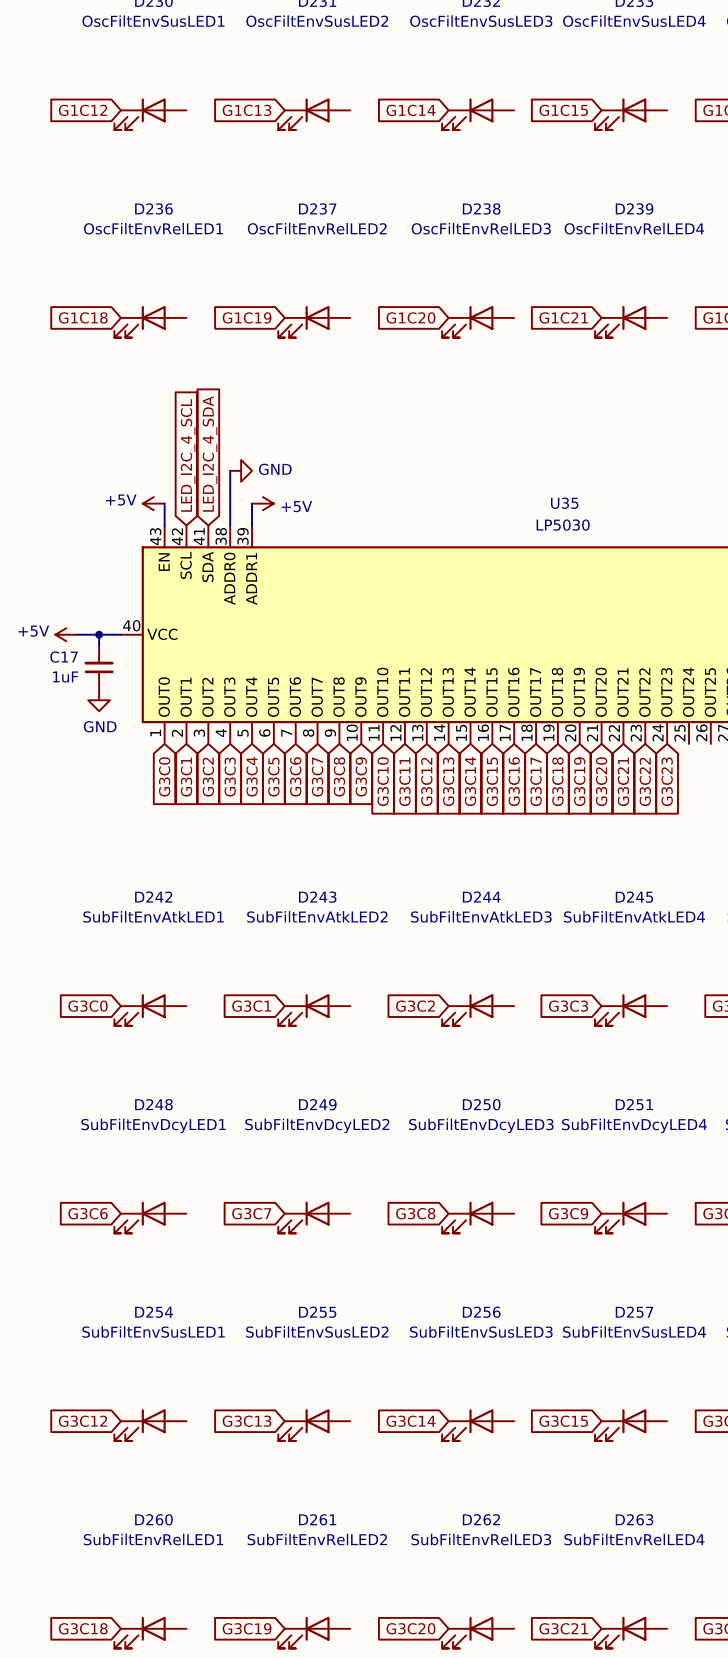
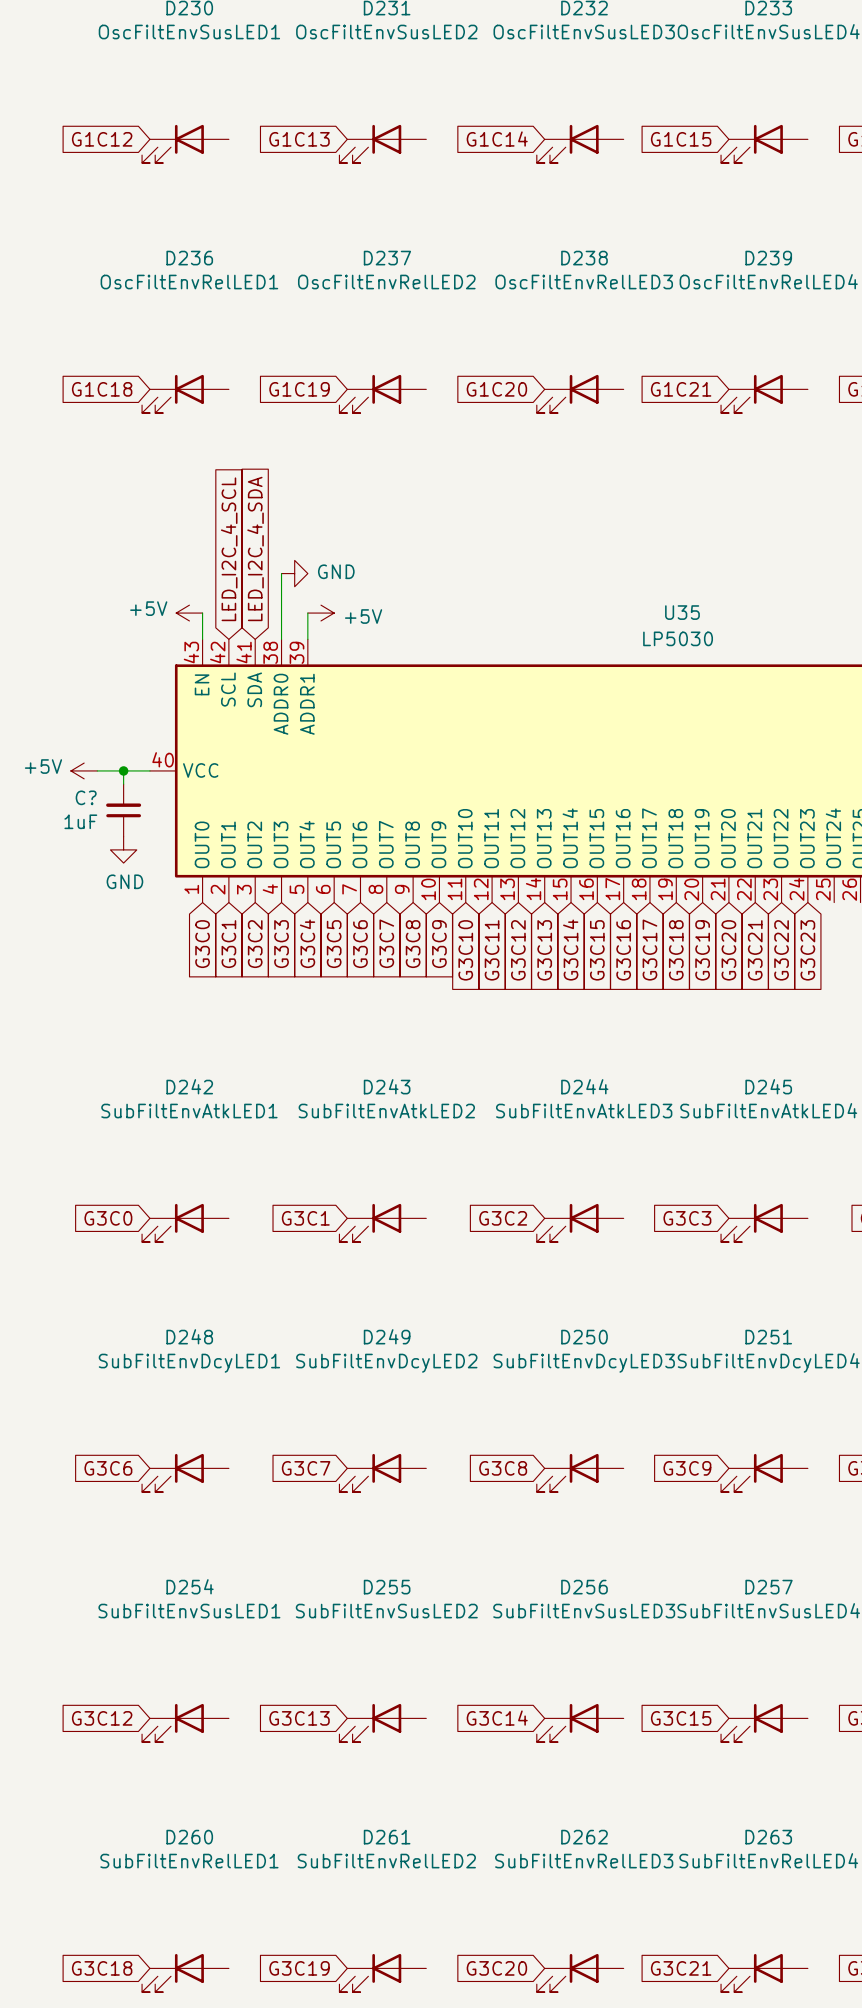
C17 name: C17 (64, 657) -> C? (86, 797)

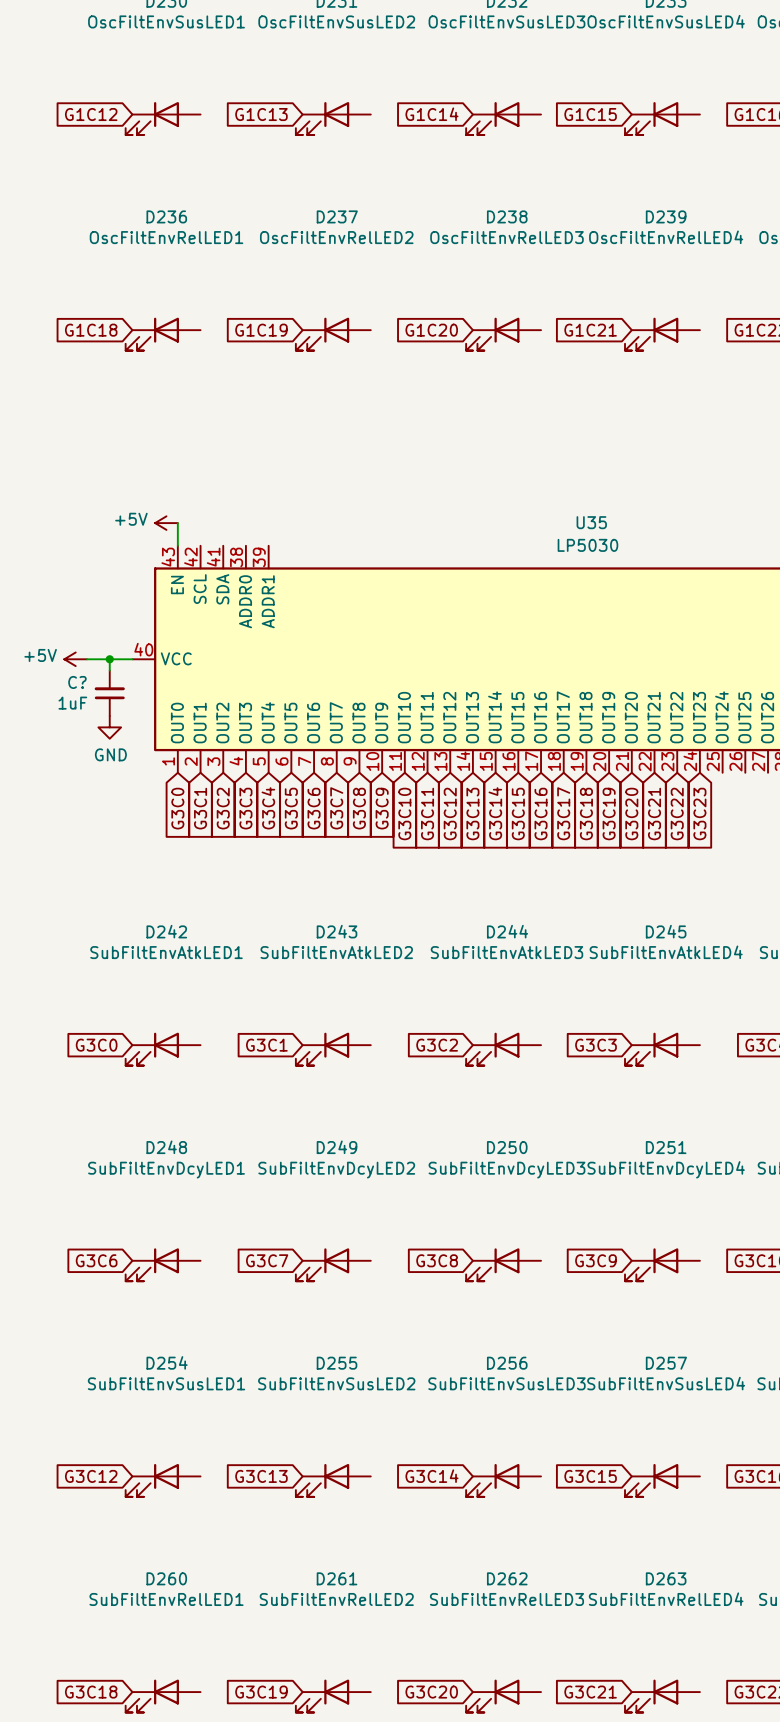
global label: LED_I2C_4_SDA (255, 548) -> none
global label: LED_I2C_4_SCL (229, 549) -> none
wire: (281, 573) (281, 639) -> none
power symbol: GND (294, 573) -> none
wire: (307, 613) (307, 639) -> none
power symbol: +5V (321, 613) -> none

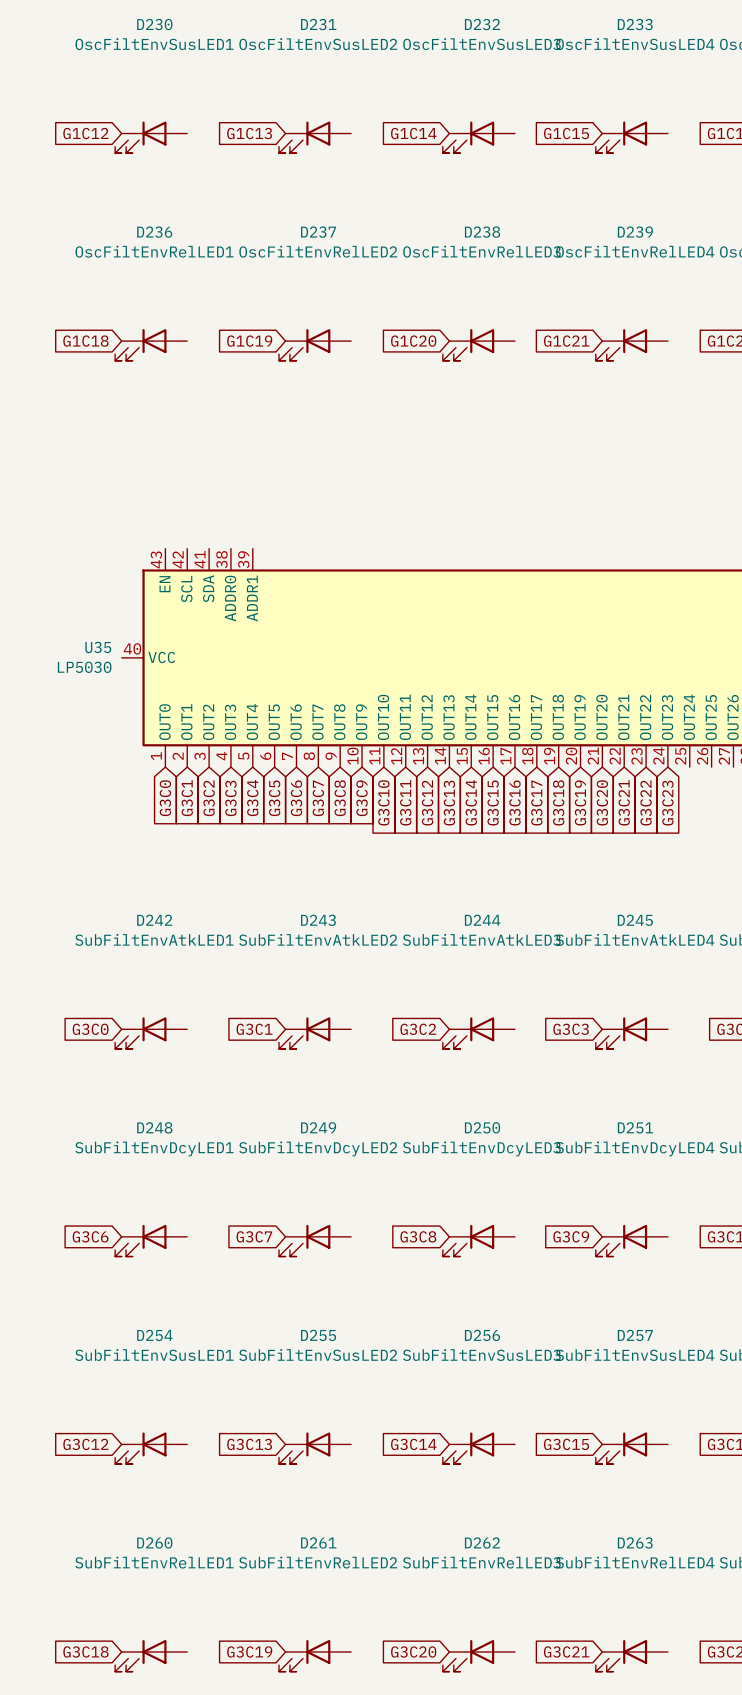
U35 name position: U35 (591, 522) -> U35 (98, 647)
power symbol: +5V (166, 523) -> none
wire: (177, 523) (177, 545) -> none
U35 value position: LP5030 (587, 545) -> LP5030 (84, 667)
power symbol: +5V (75, 659) -> none
wire: (87, 659) (132, 659) -> none
wire: (109, 659) (109, 670) -> none
junction: (109, 659) -> none
C?: 1uF (109, 693) -> none
power symbol: GND (109, 727) -> none

